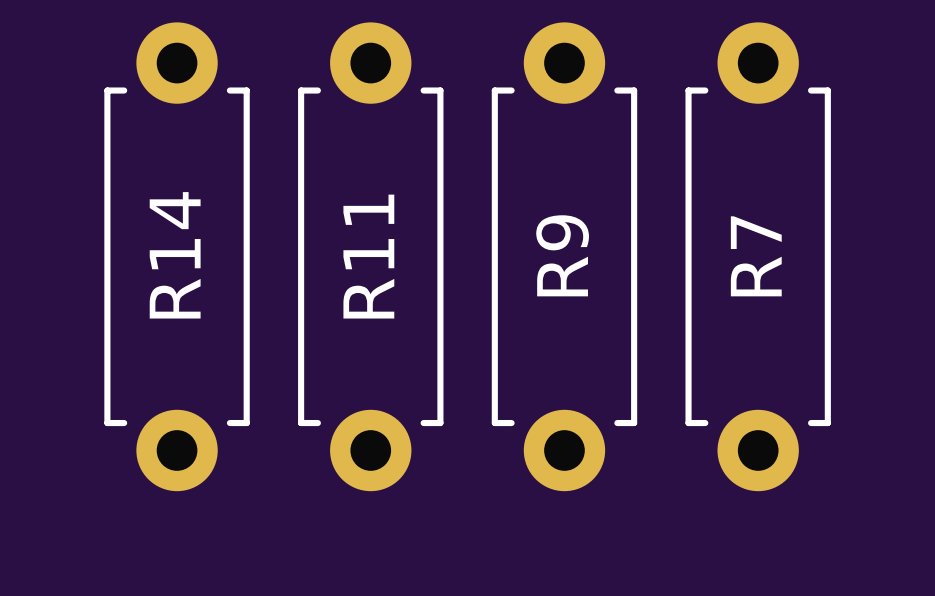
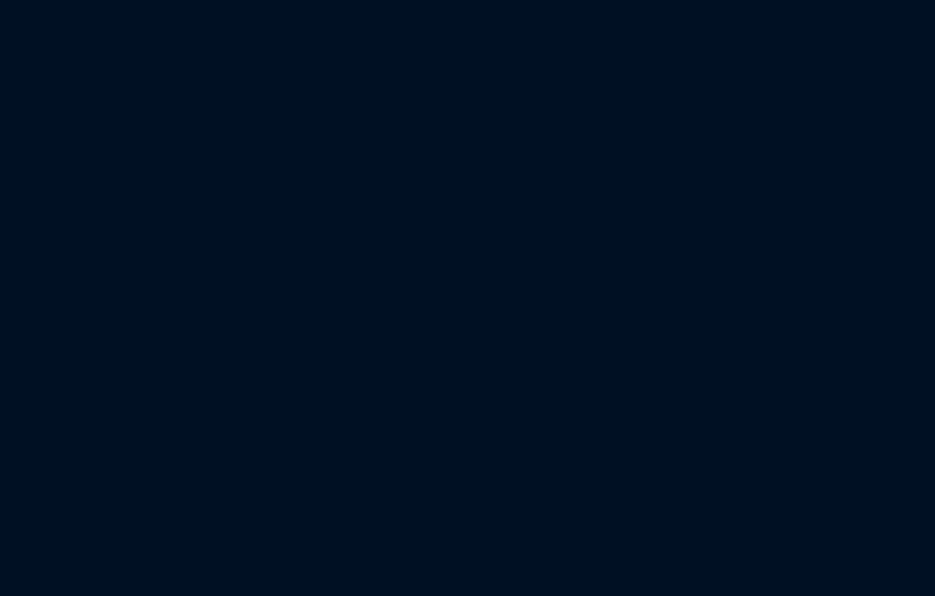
R14: (177, 256) -> none
R11: (370, 256) -> none
R9: (564, 256) -> none
R7: (758, 256) -> none

